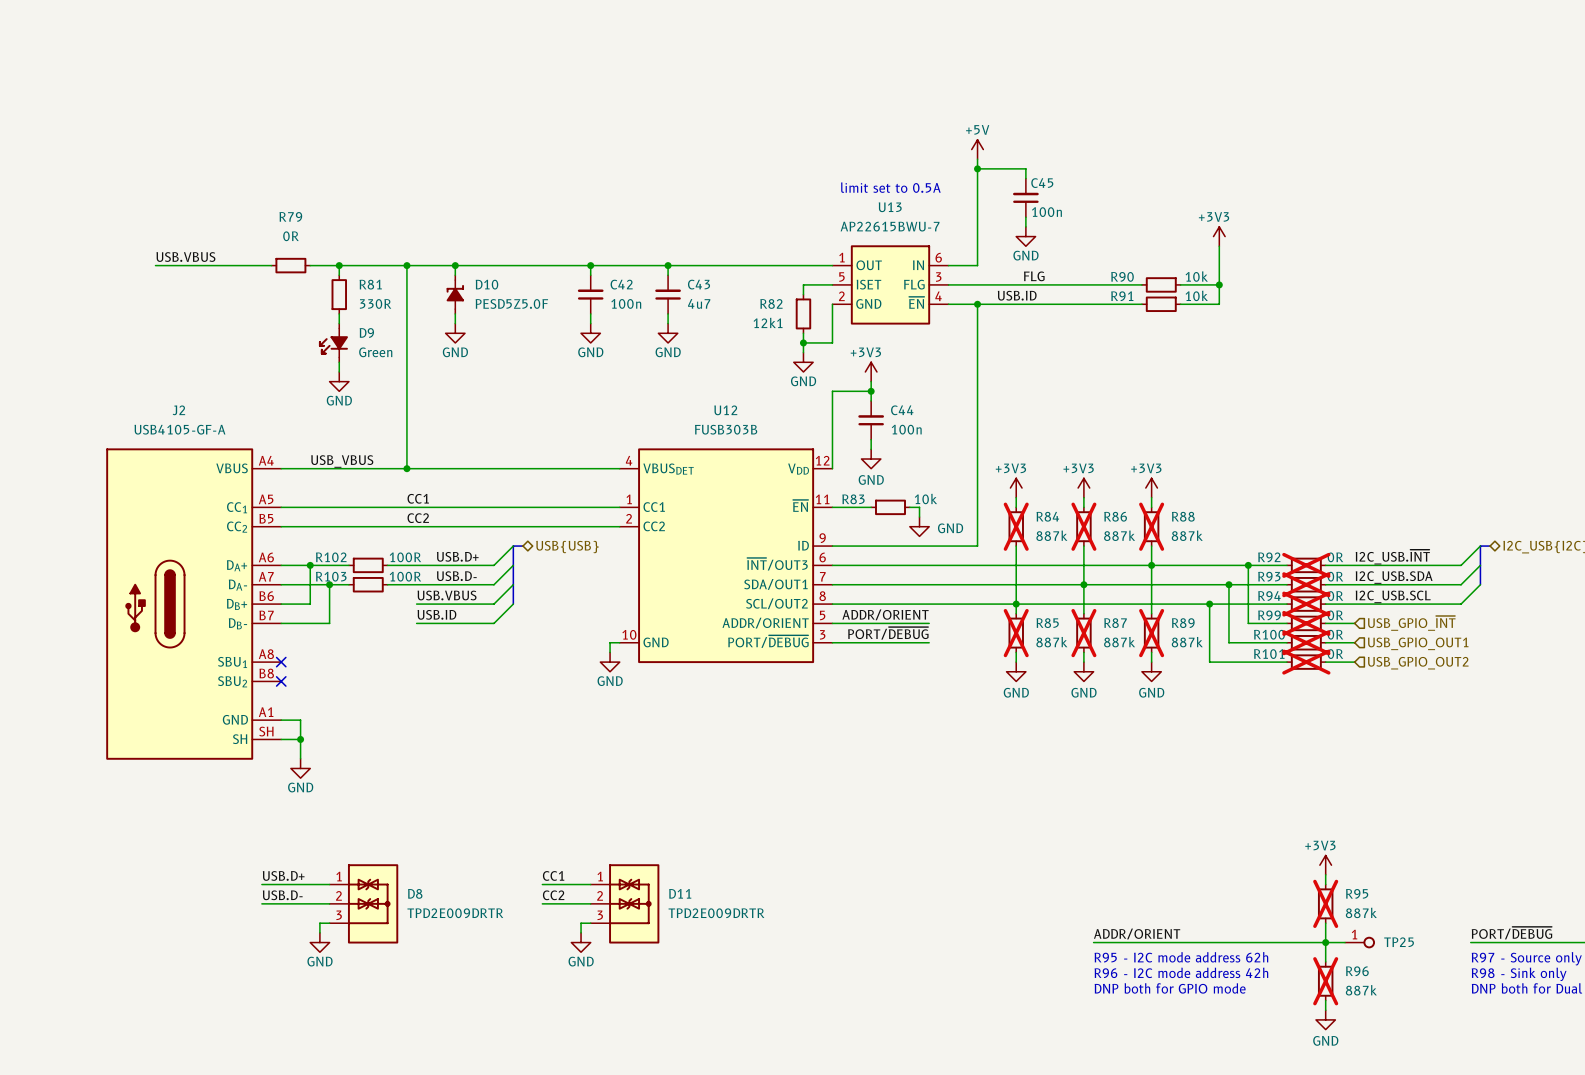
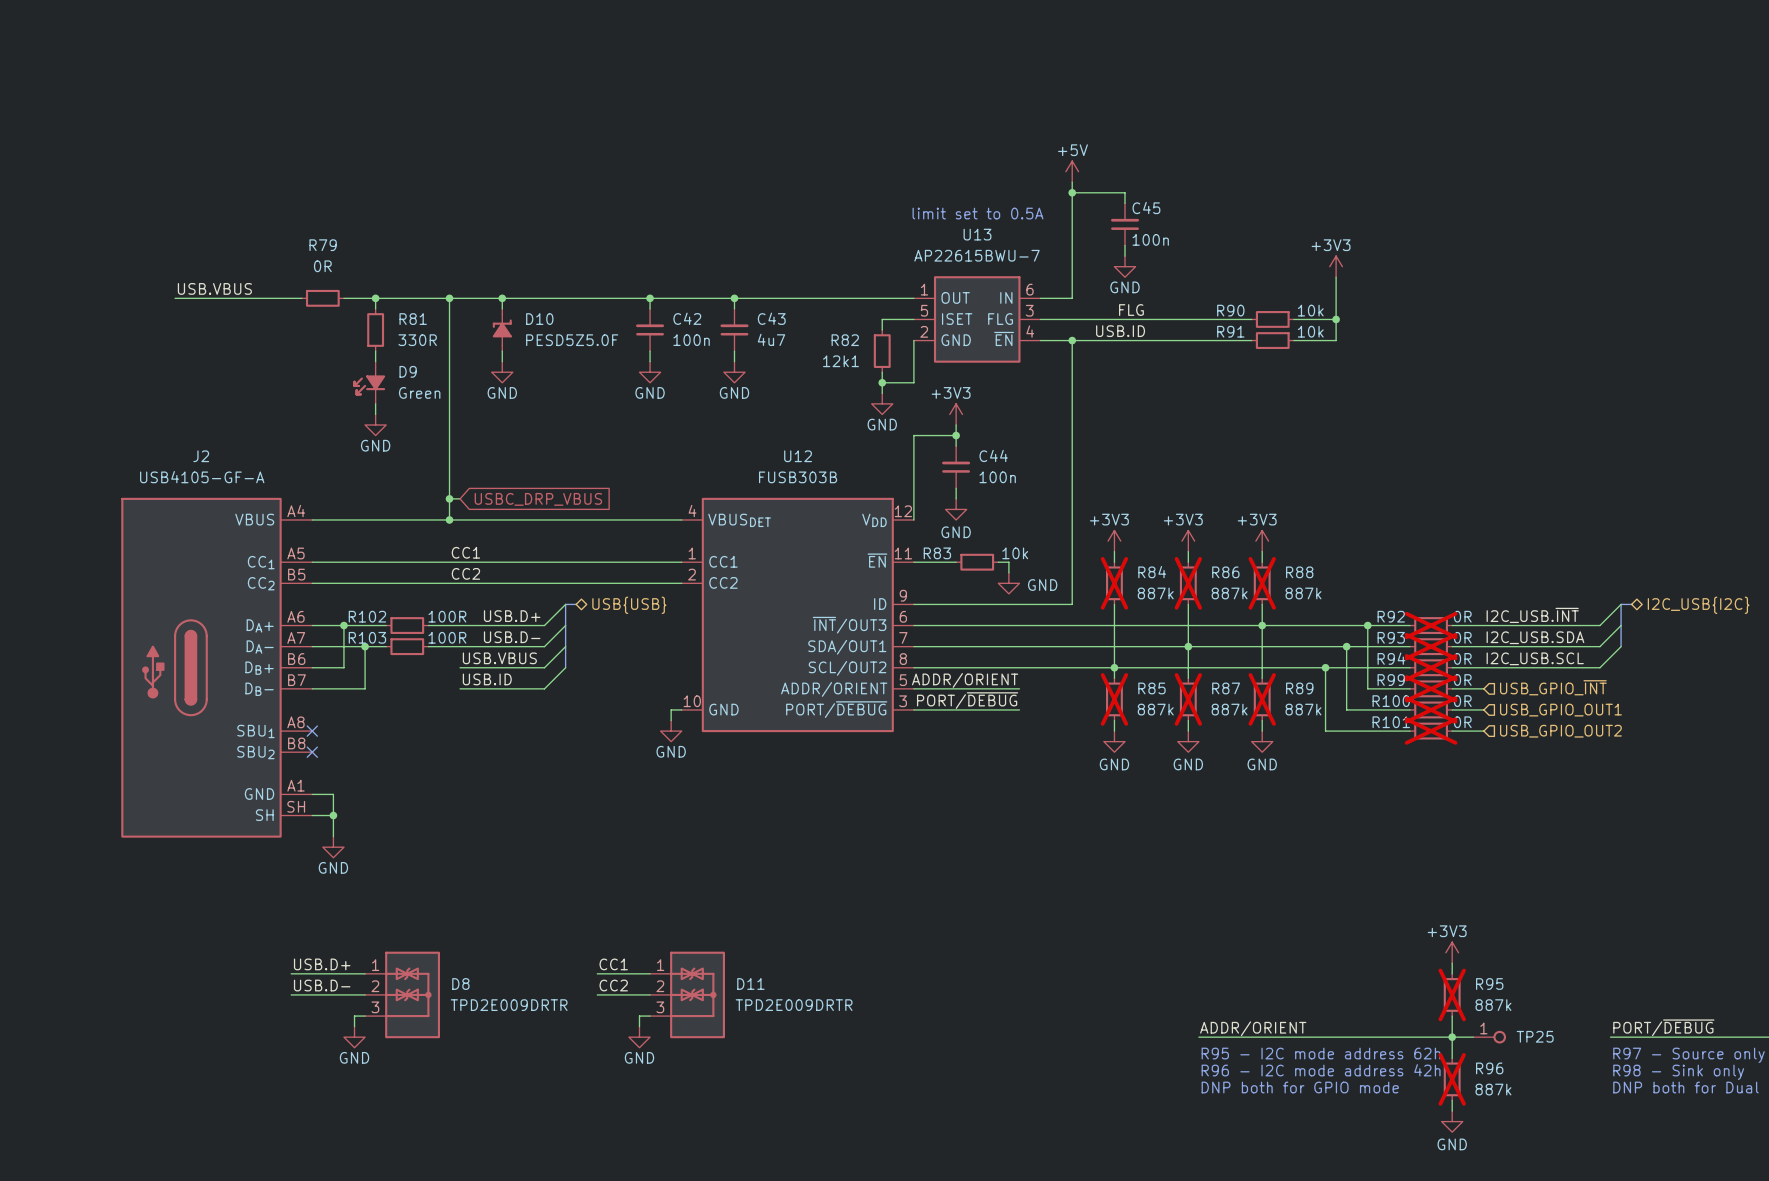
wire: none -> (449, 498) (460, 498)
junction: none -> (449, 498)
global label: none -> USBC_DRP_VBUS (538, 499)
label: USB_VBUS (342, 461) -> none

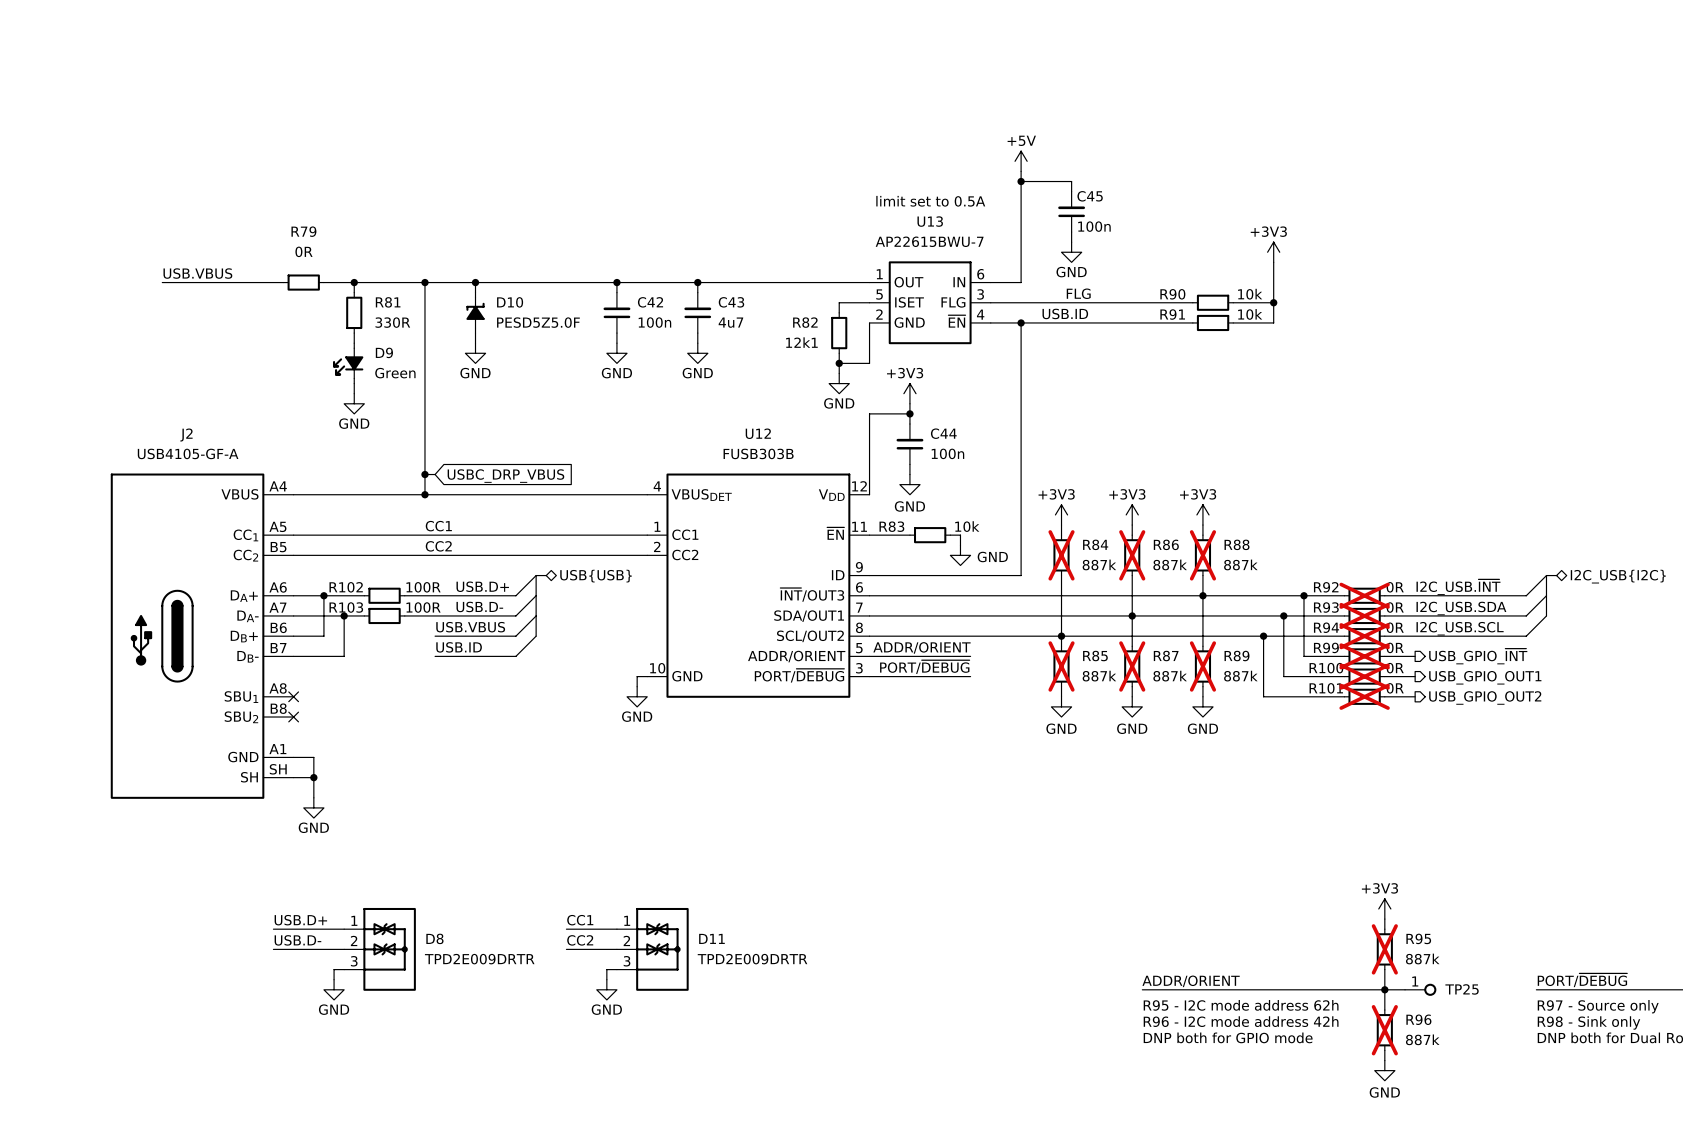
hierarchical label shape: input (1553, 687) -> output (1478, 656)
hierarchical label shape: input (1560, 710) -> output (1485, 677)
hierarchical label shape: input (1560, 731) -> output (1485, 697)

